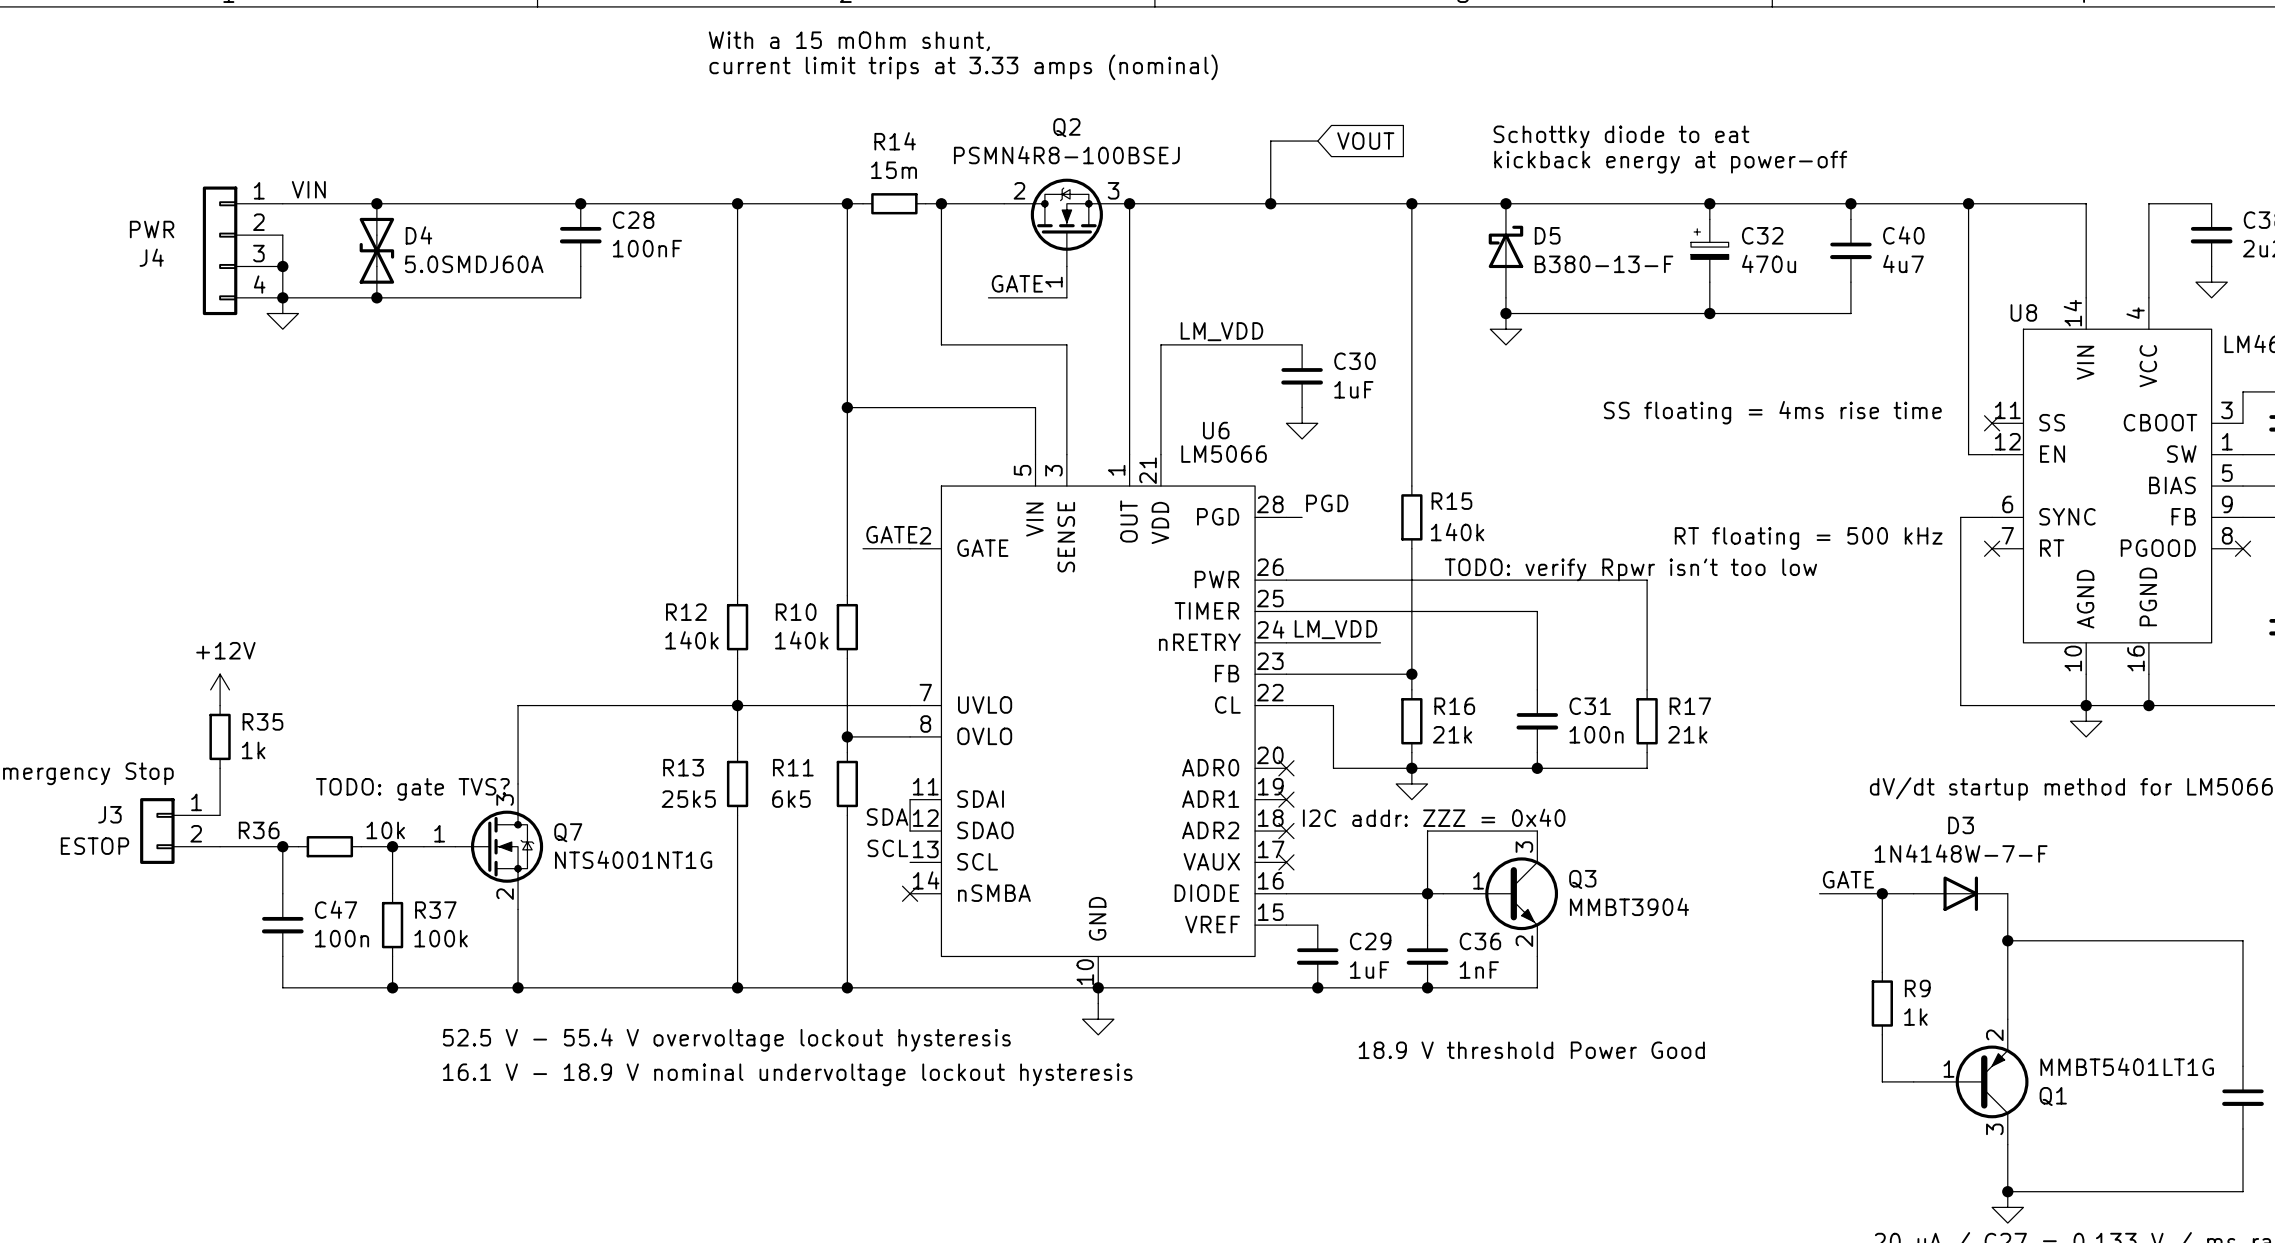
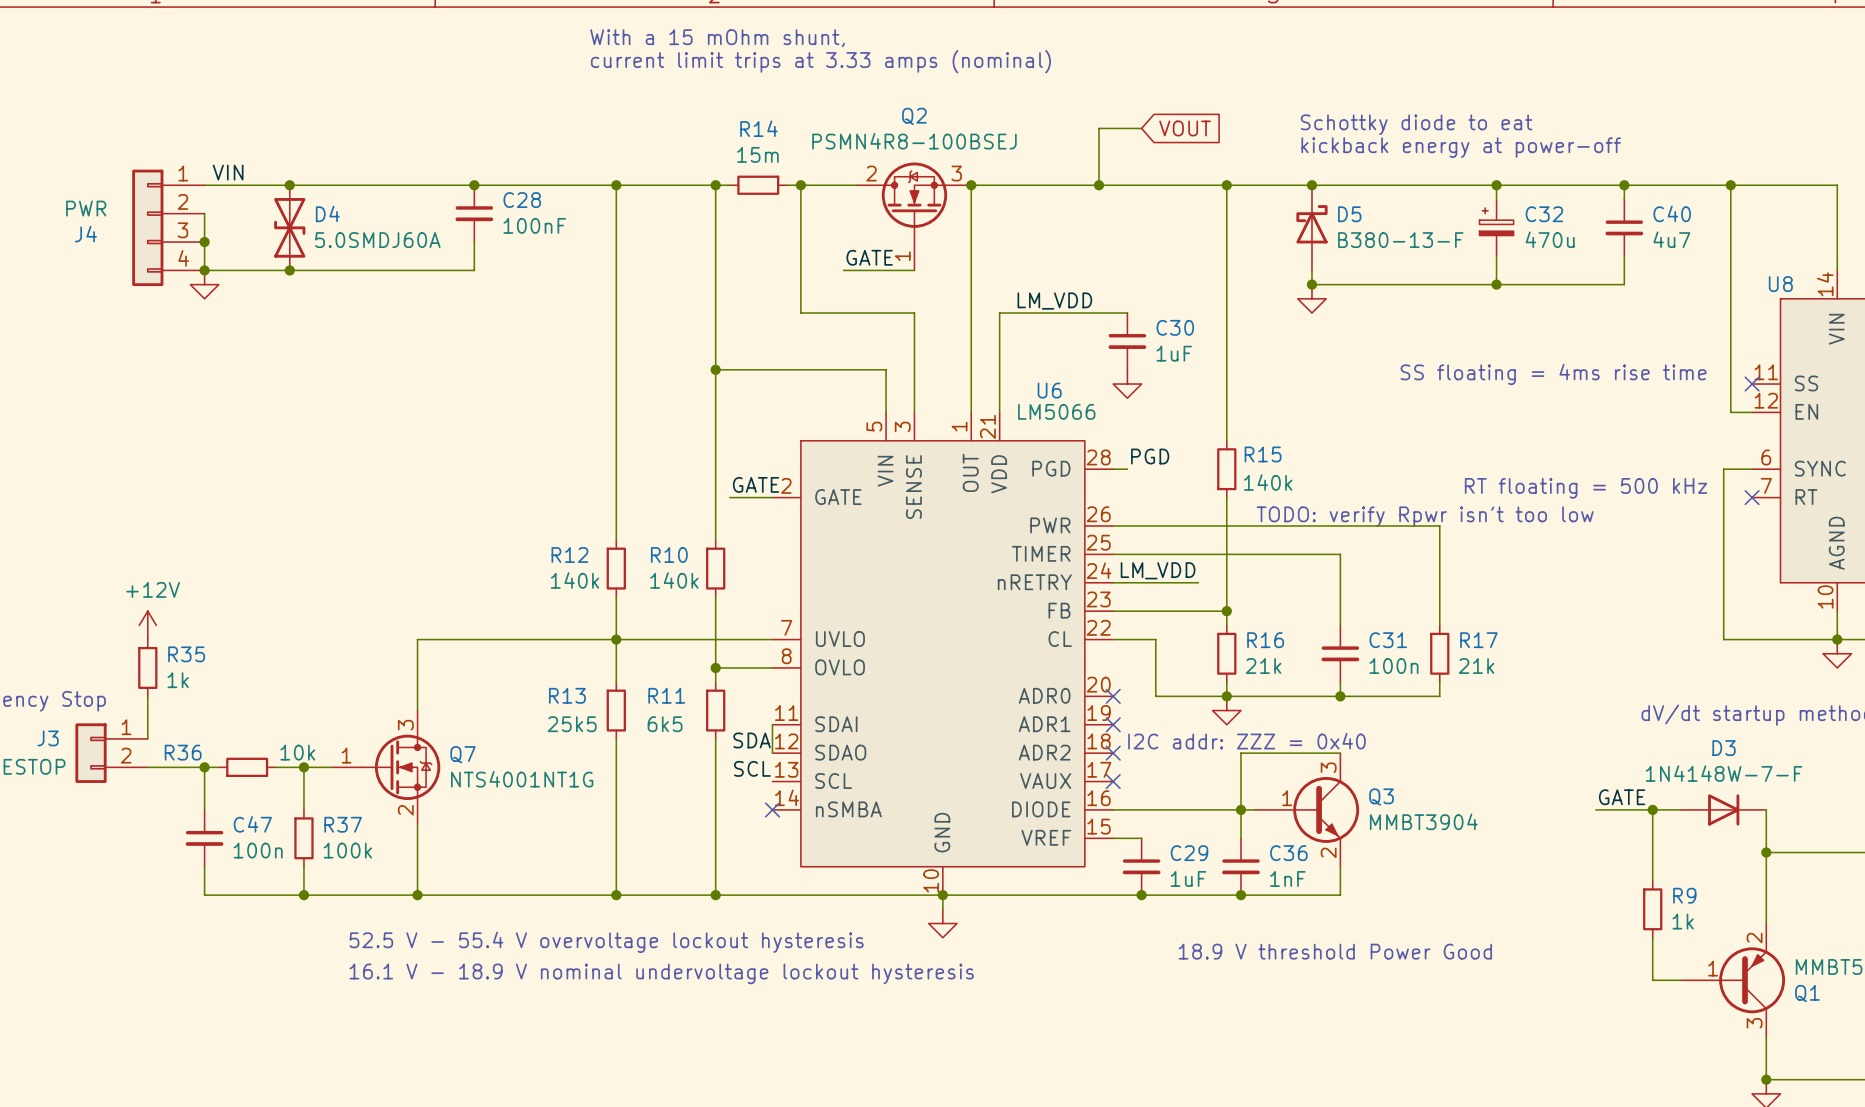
text: TODO: gate TVS? (412, 789) -> none

